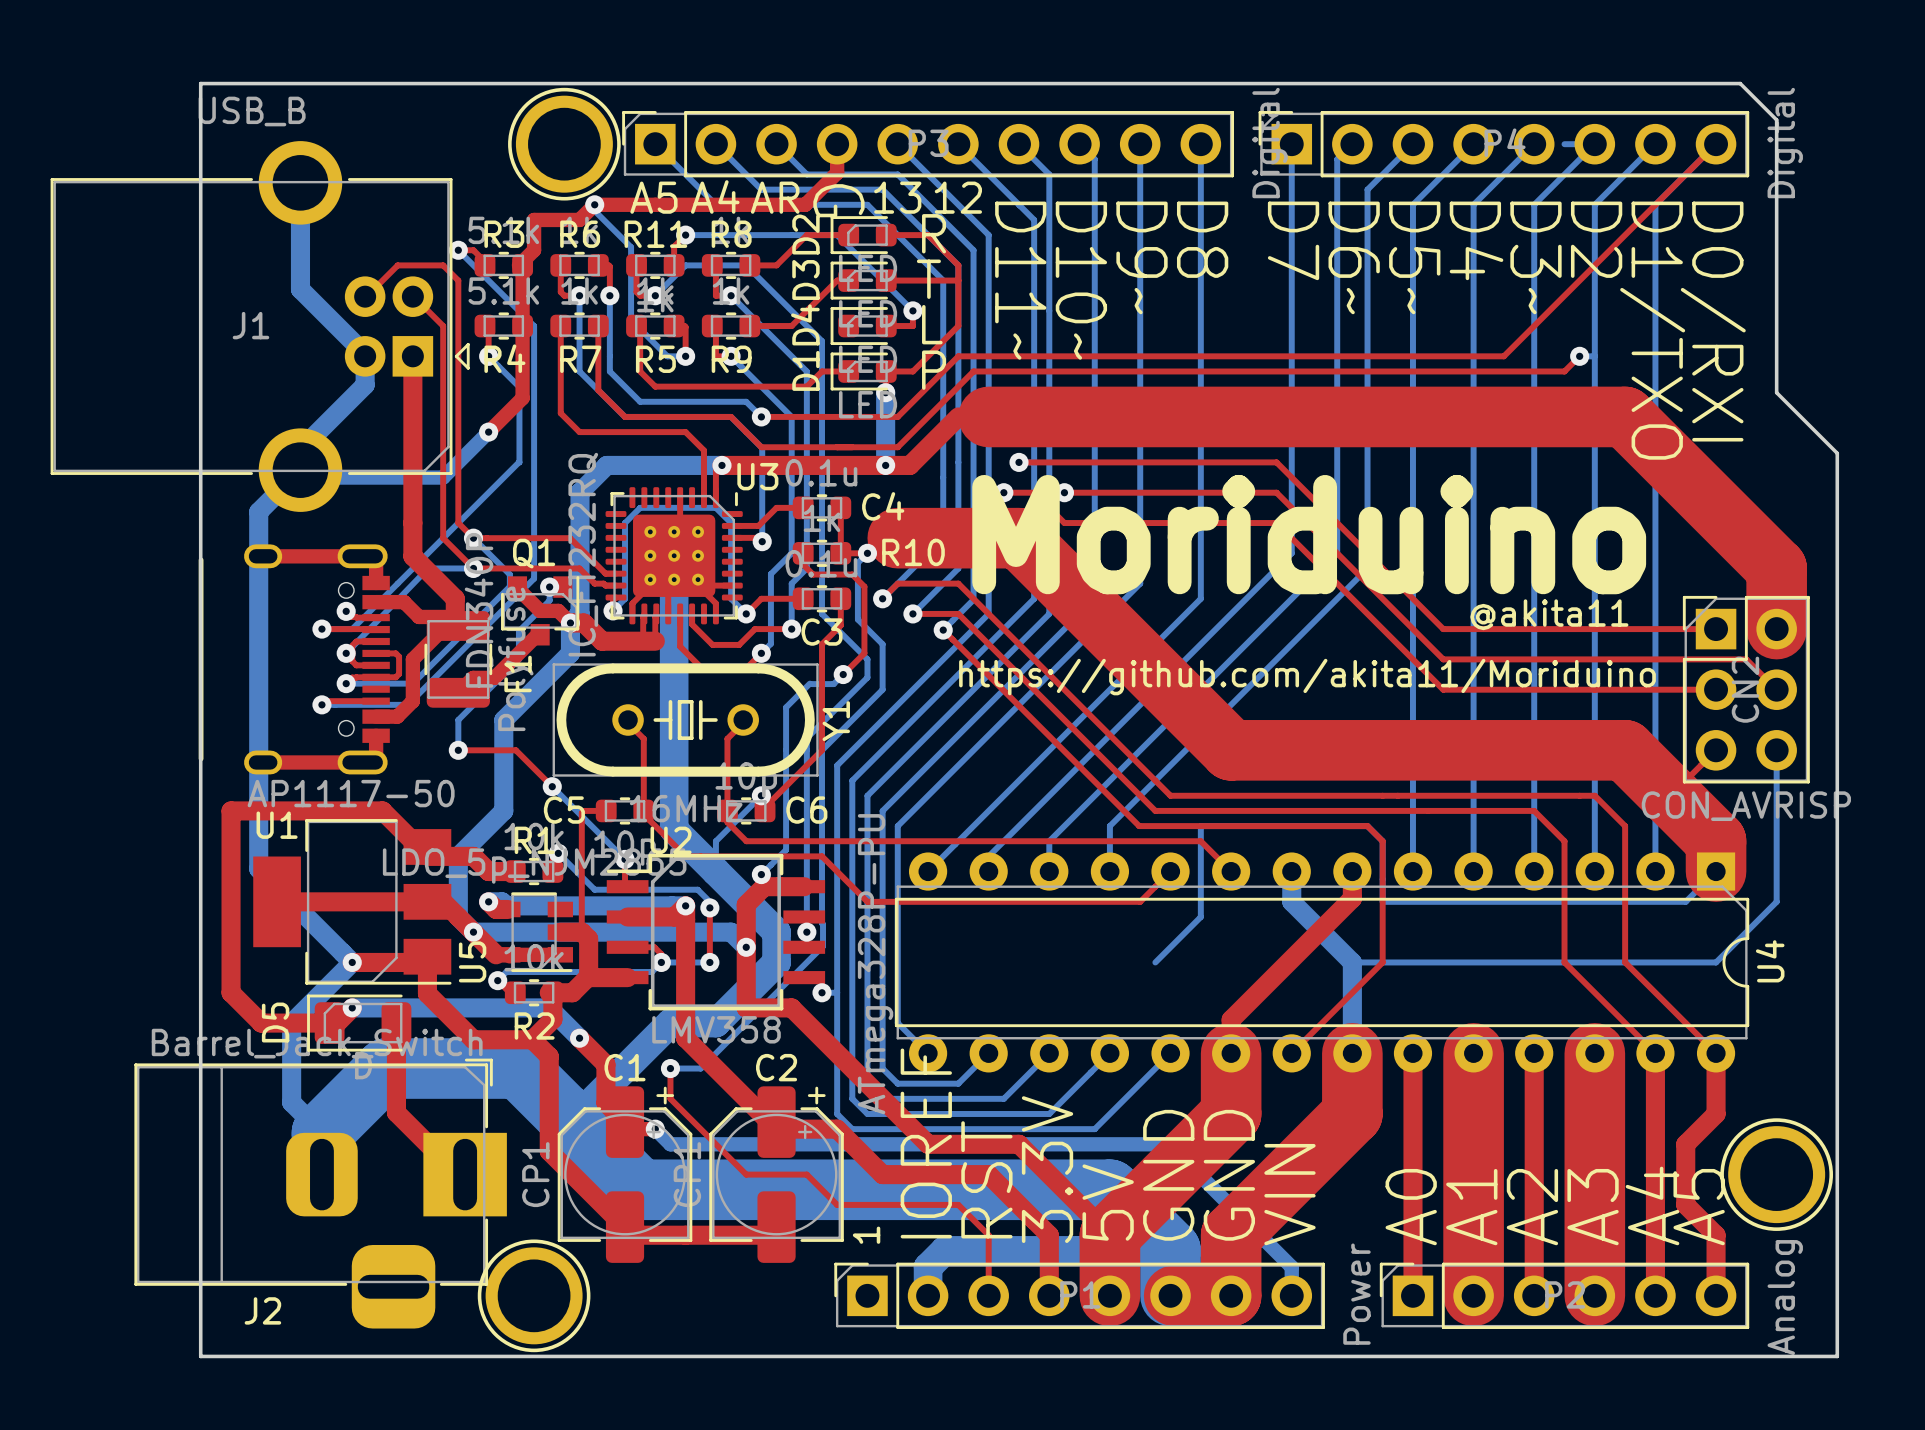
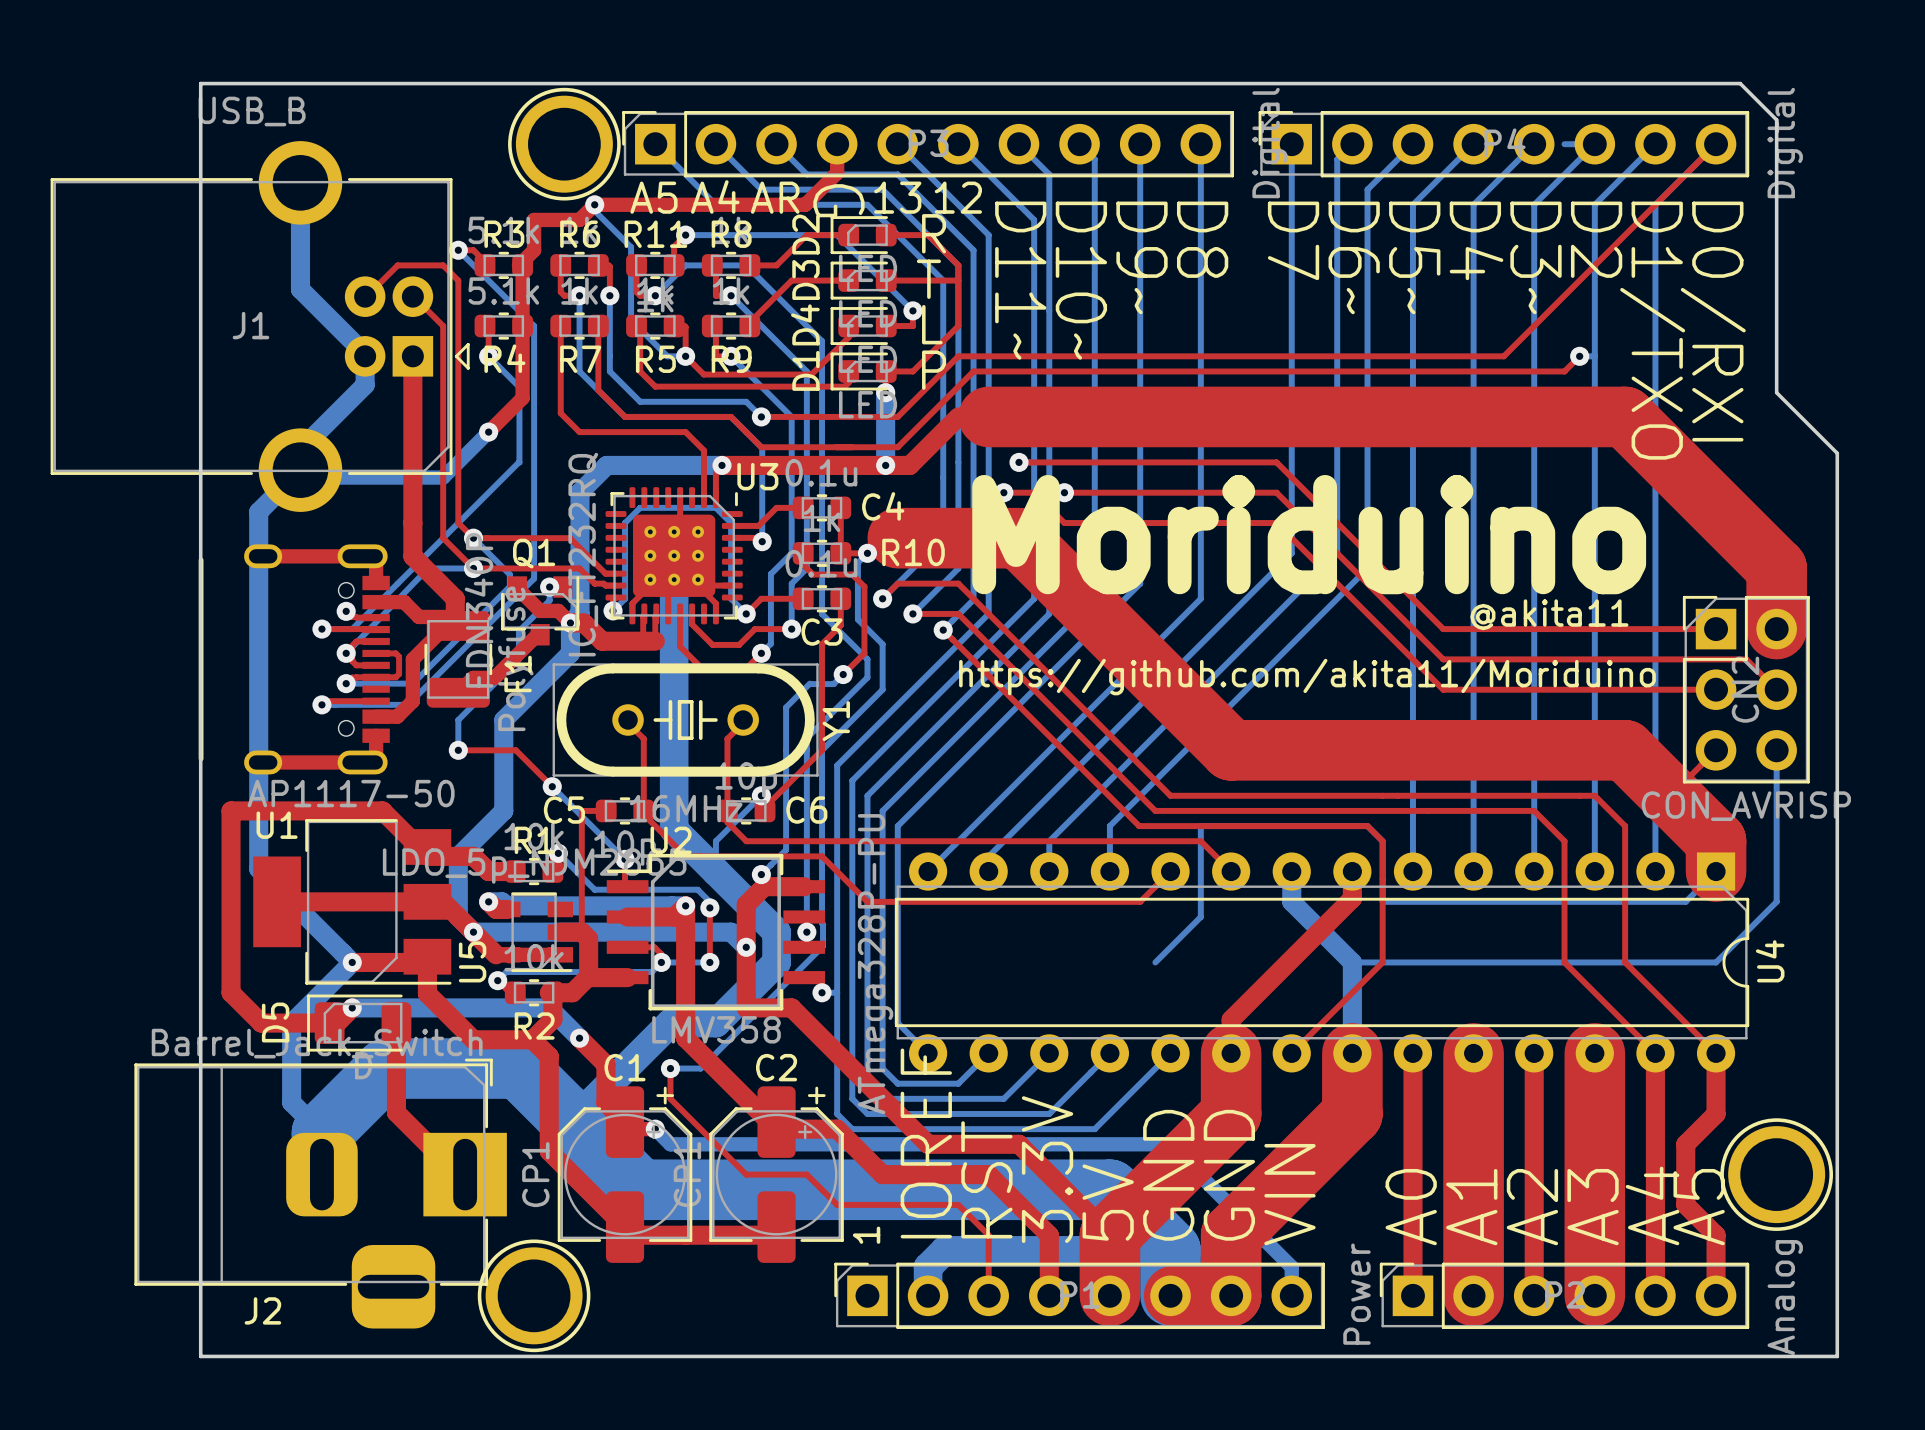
top track: (837, 280) (791, 326) (746, 326) -> (837, 280) (791, 280) (746, 326)
top track: none -> (848, 326) (848, 337) (811, 374) (703, 374) (685, 356)
top track: (848, 371) (822, 371) (806, 386) -> (848, 371) (848, 382) (844, 386) (806, 386)

